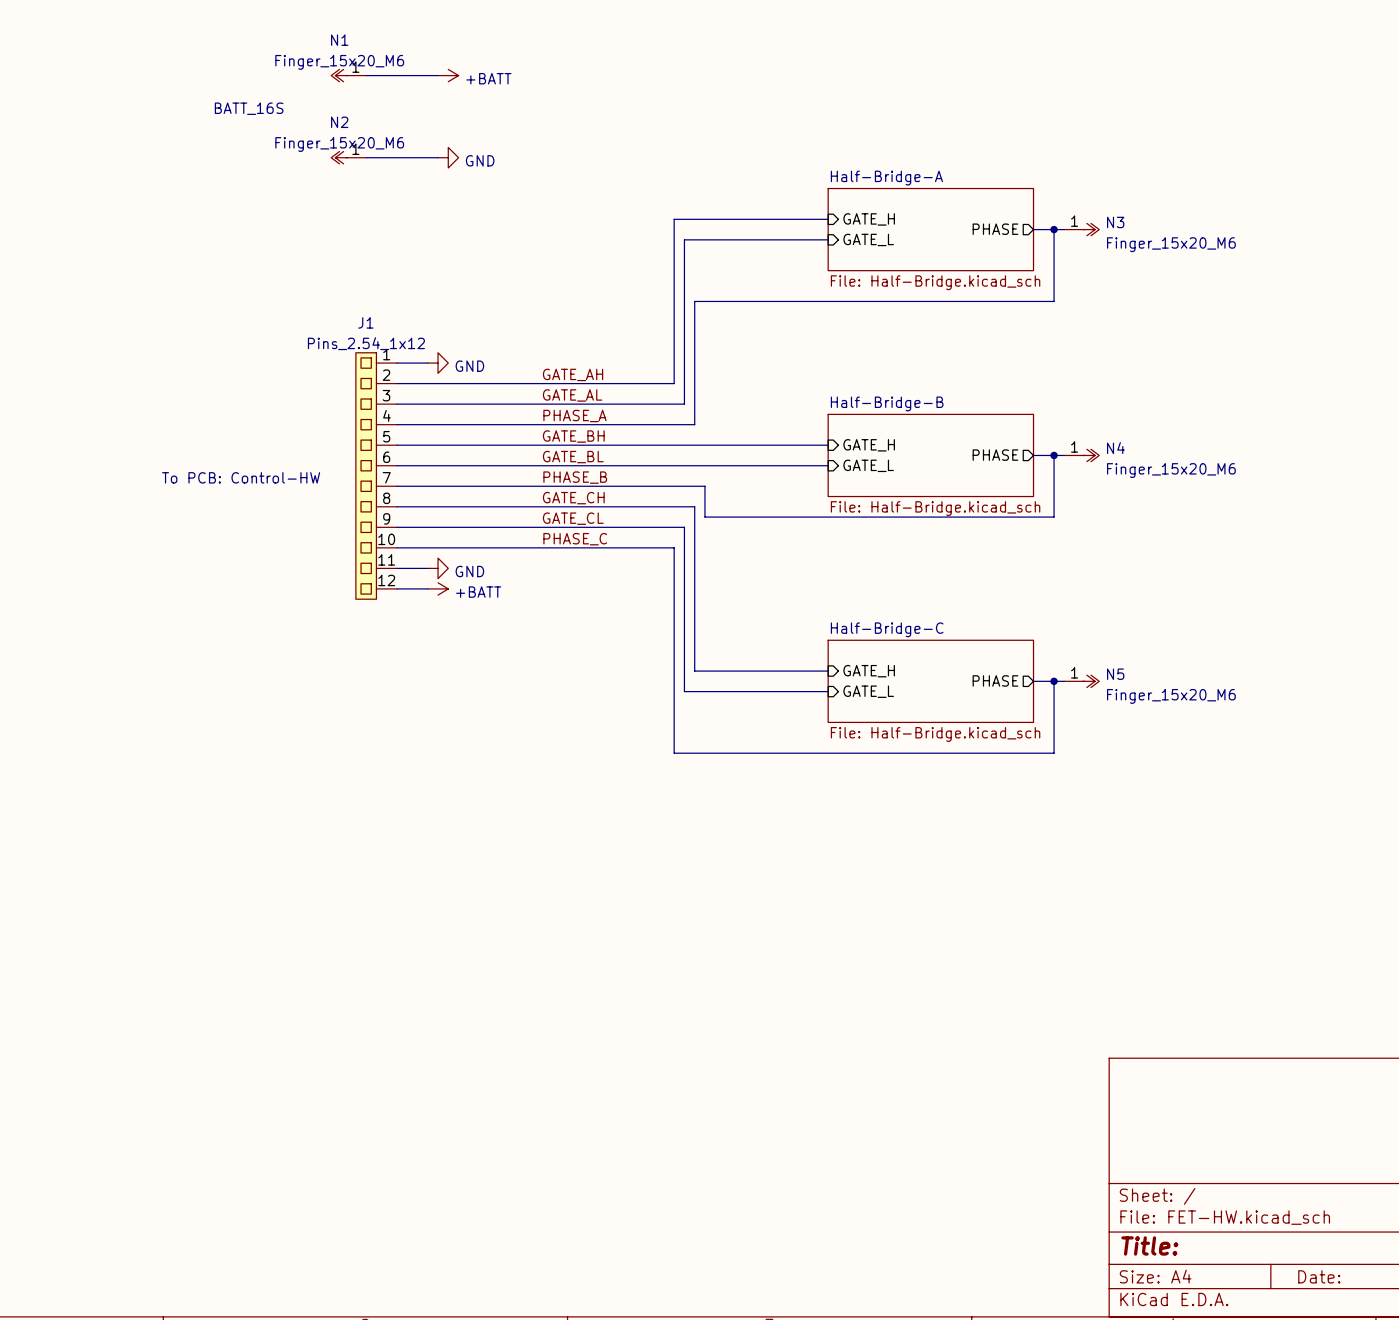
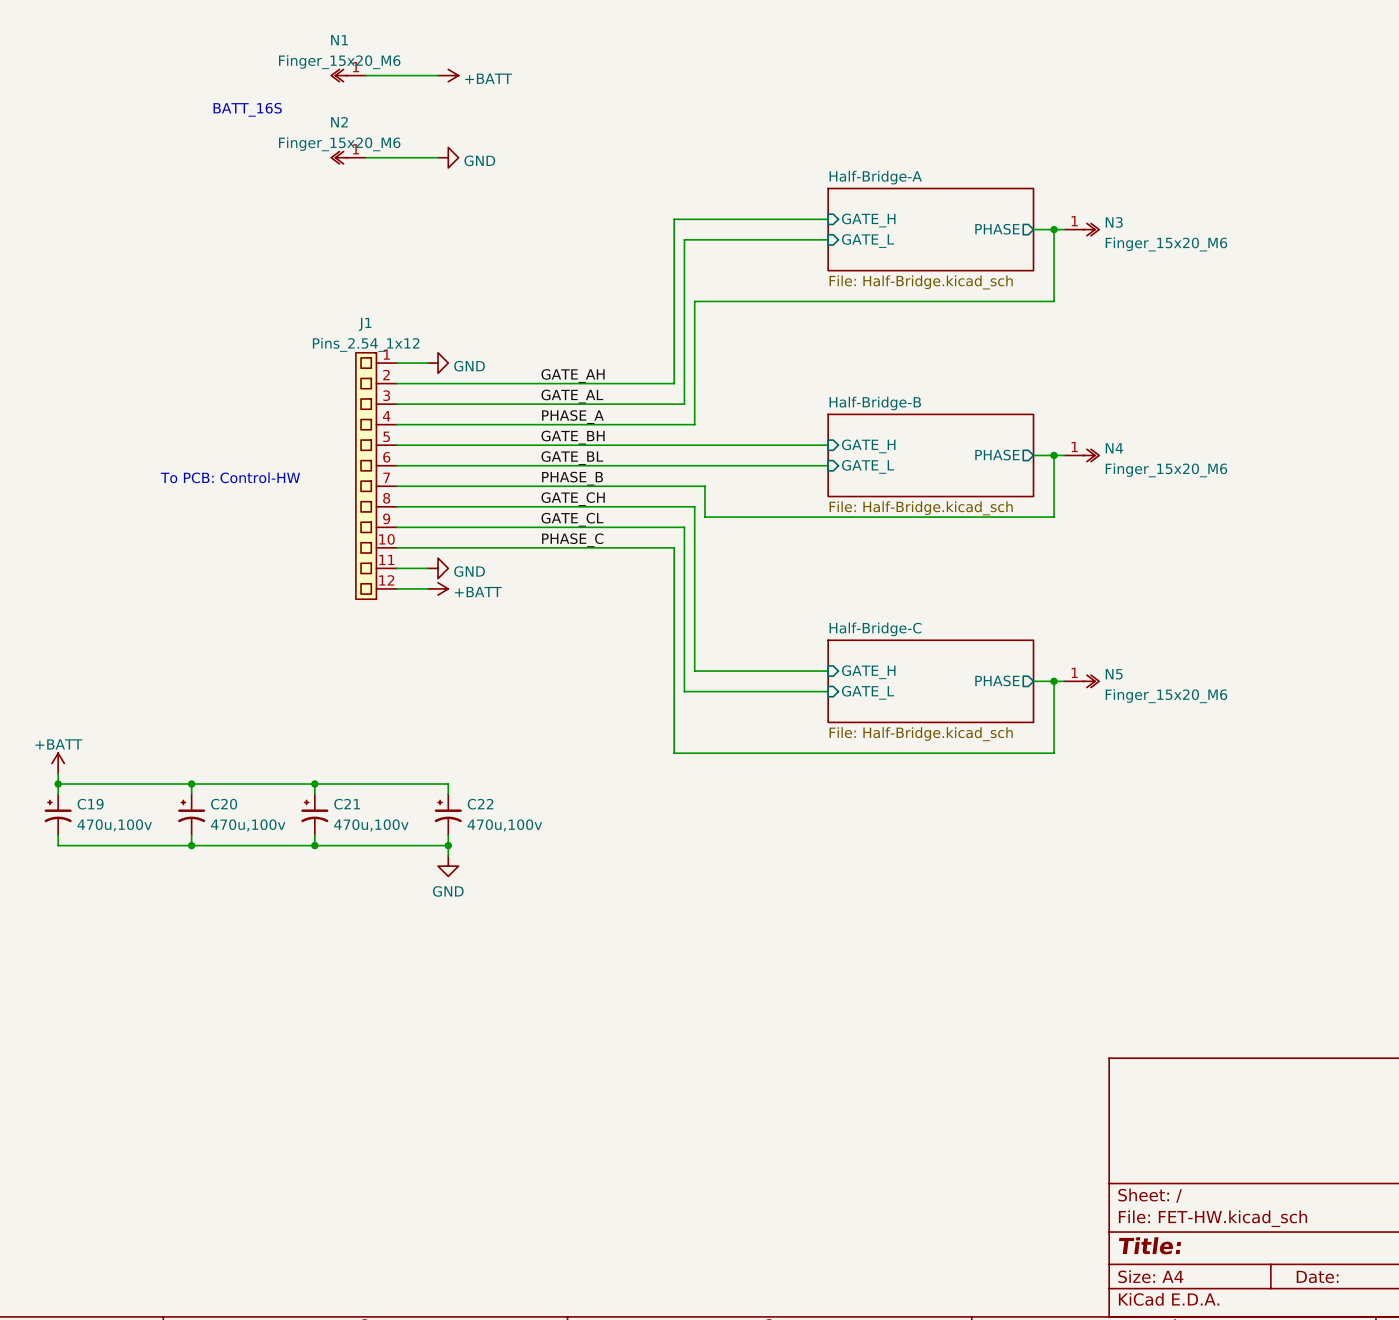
power symbol: none -> +BATT (58, 763)
wire: none -> (58, 773) (58, 794)
wire: none -> (58, 784) (448, 784) (448, 794)
junction: none -> (58, 784)
wire: none -> (191, 784) (191, 794)
junction: none -> (191, 784)
wire: none -> (314, 784) (314, 794)
junction: none -> (314, 784)
C19: none -> 470u,100v (58, 814)
C20: none -> 470u,100v (191, 814)
C21: none -> 470u,100v (314, 814)
C22: none -> 470u,100v (448, 814)
wire: none -> (58, 835) (58, 845) (448, 845)
wire: none -> (191, 835) (191, 845)
wire: none -> (314, 835) (314, 845)
wire: none -> (448, 835) (448, 855)
junction: none -> (191, 845)
junction: none -> (314, 845)
junction: none -> (448, 845)
power symbol: none -> GND (448, 866)

